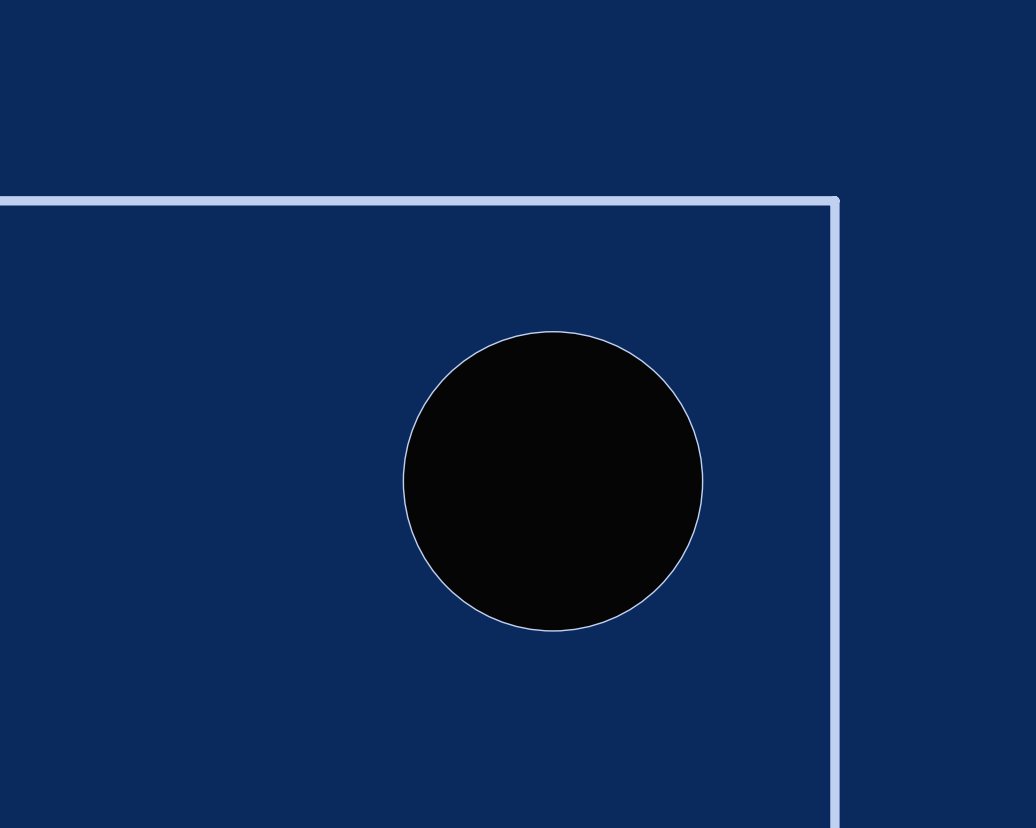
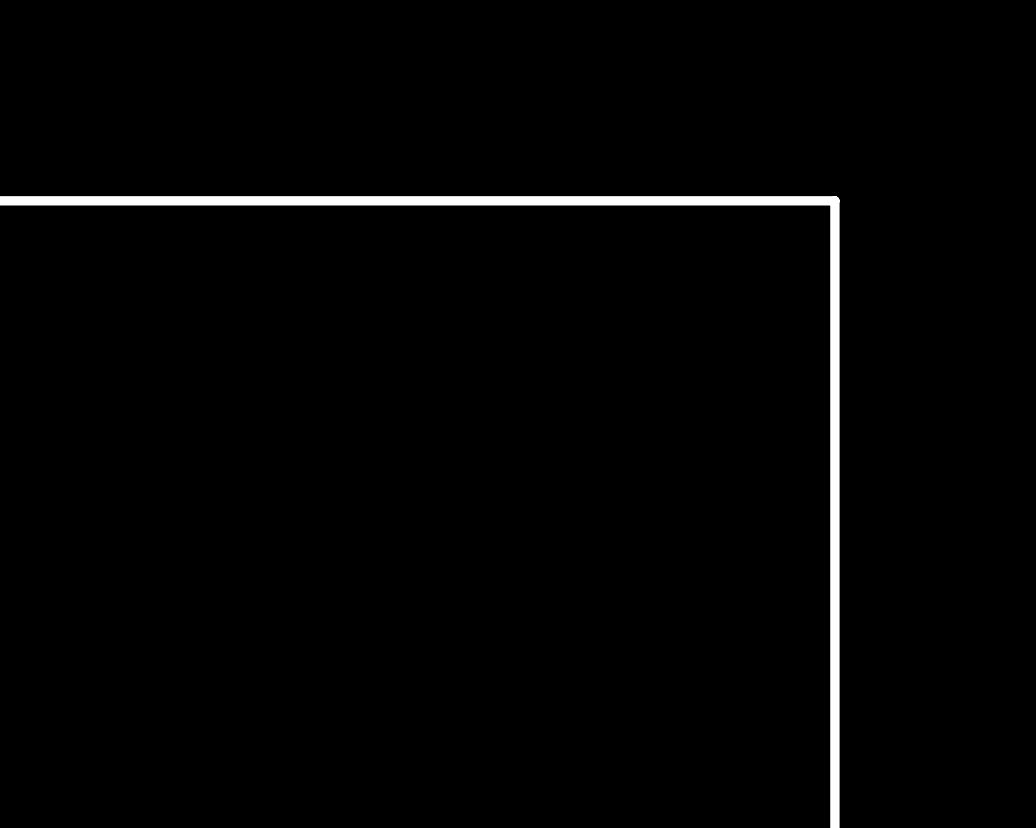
part: (552, 481) -> none

